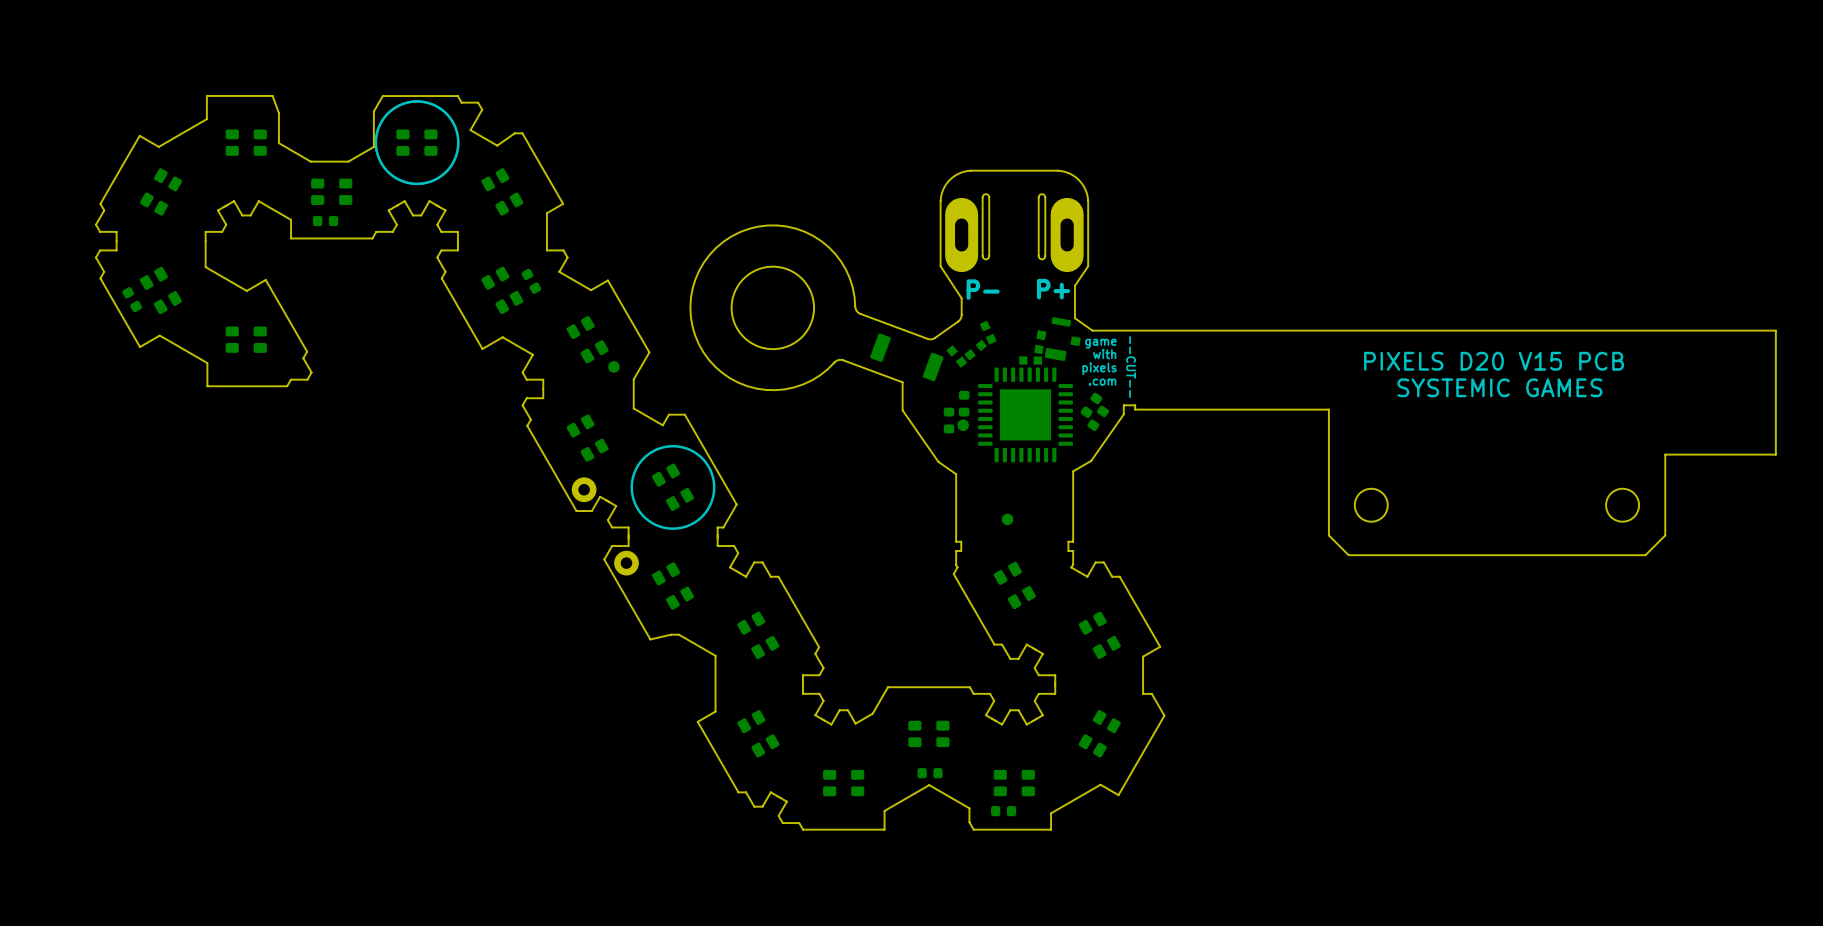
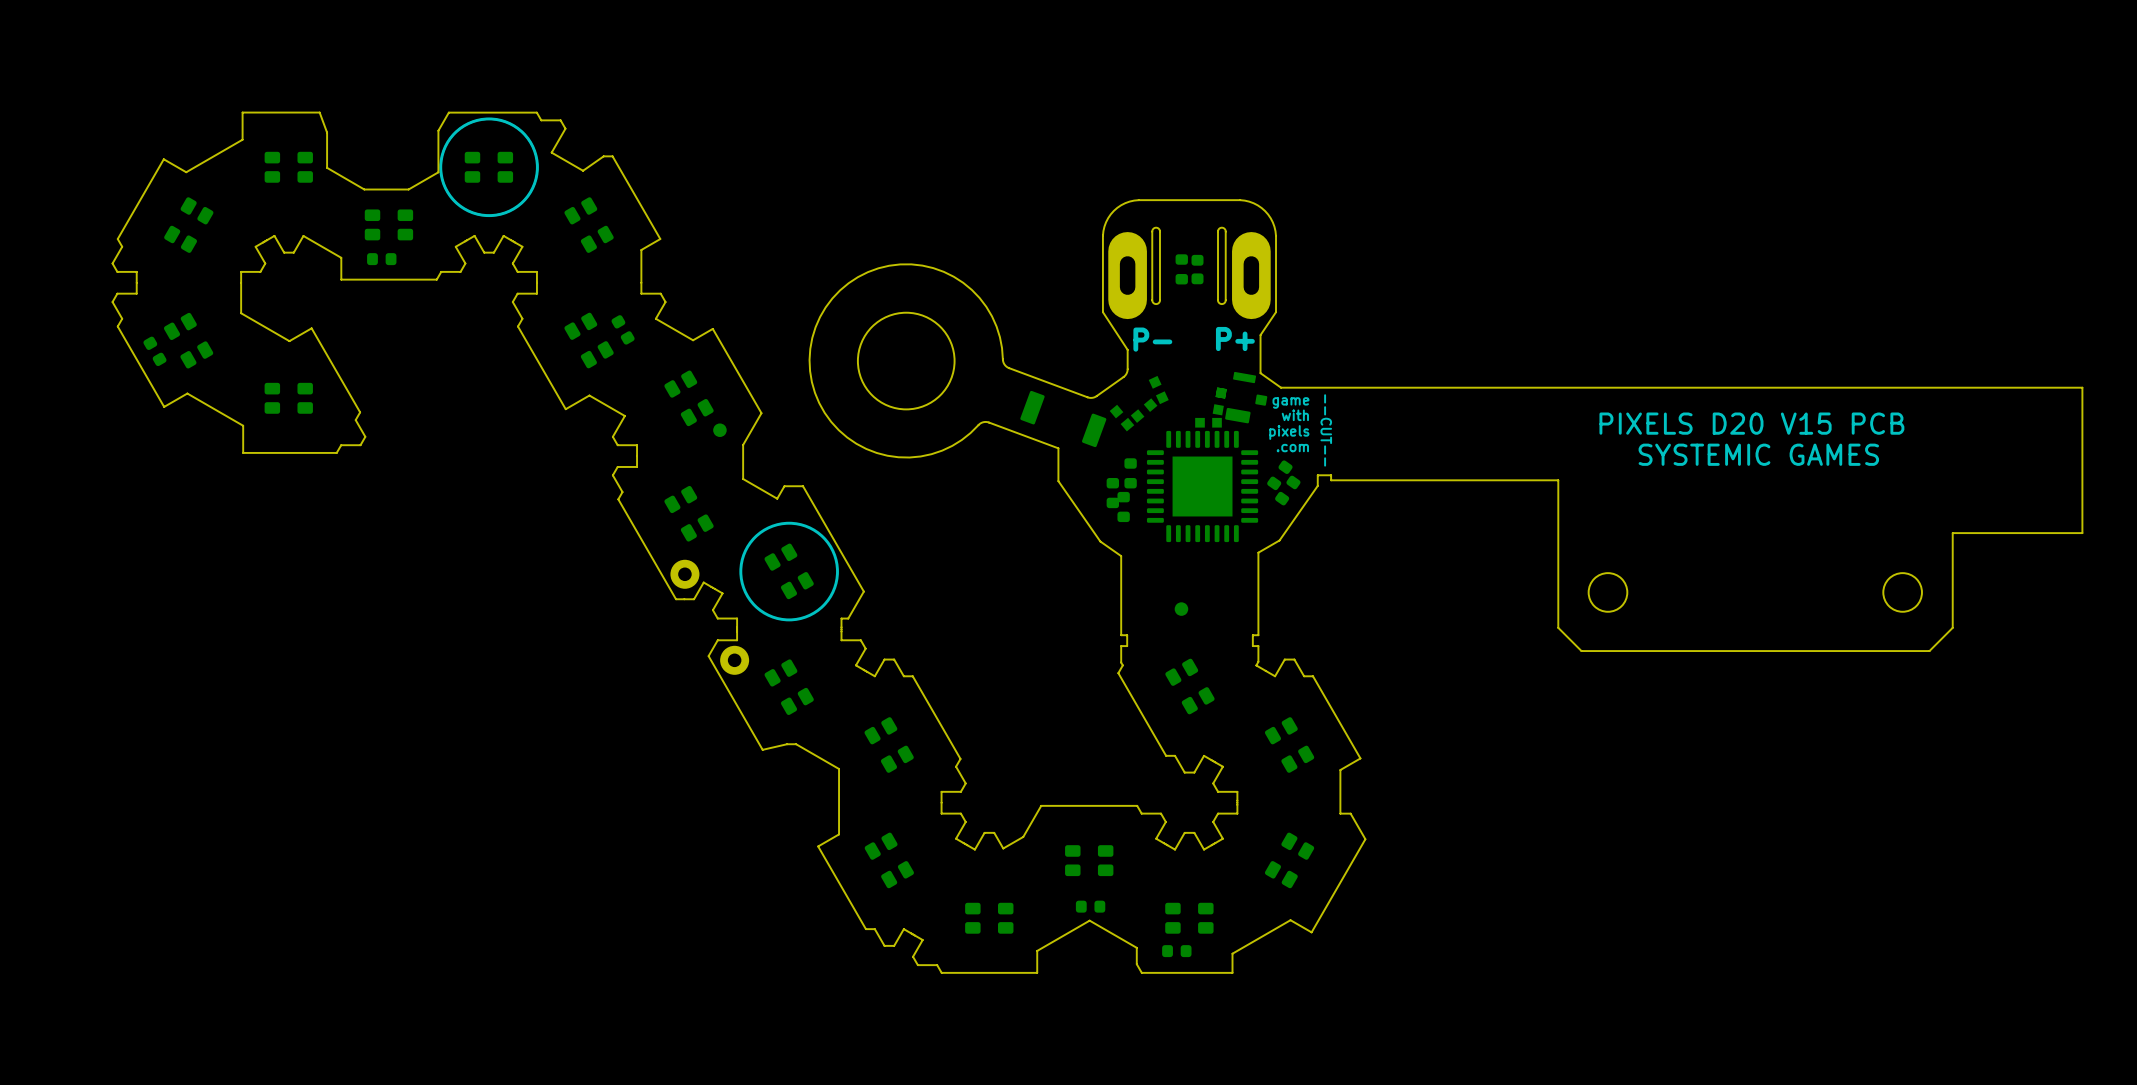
part: none -> (1181, 269)
part: none -> (1197, 269)
part footprint: [957, 419, 969, 432] -> [1117, 491, 1130, 523]

